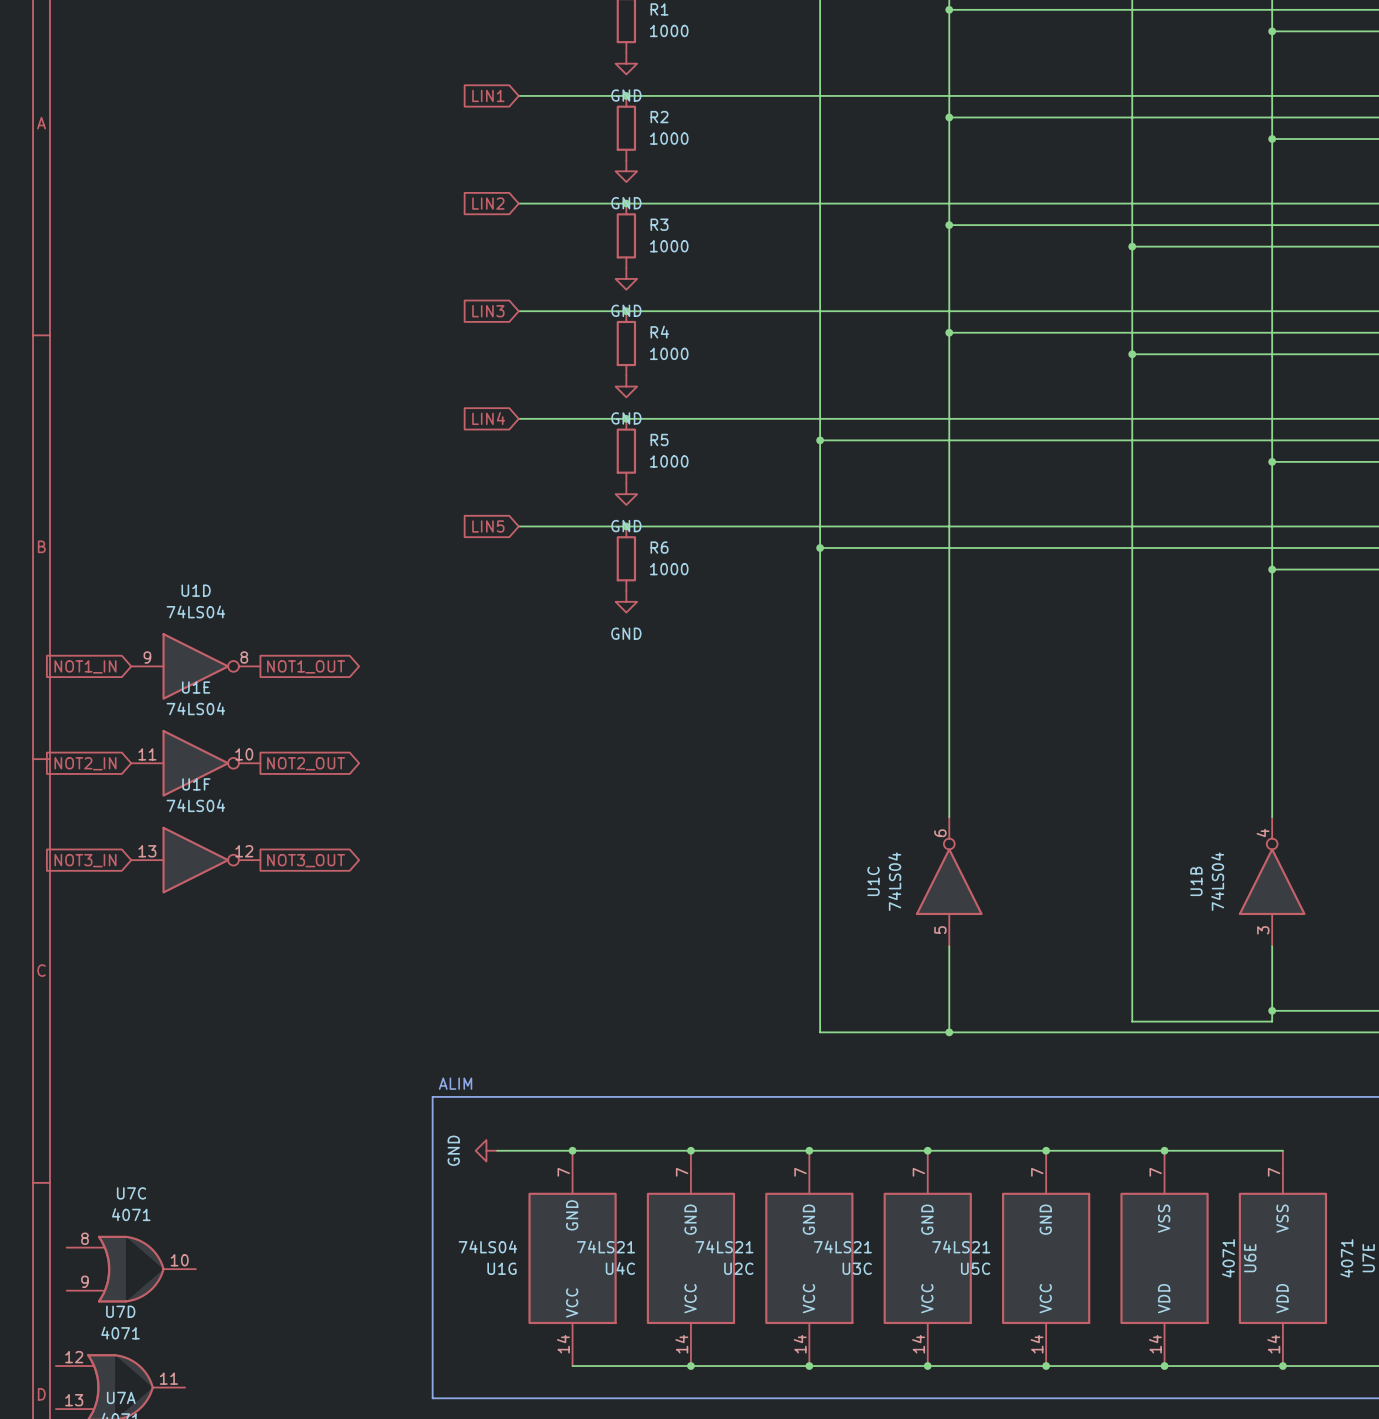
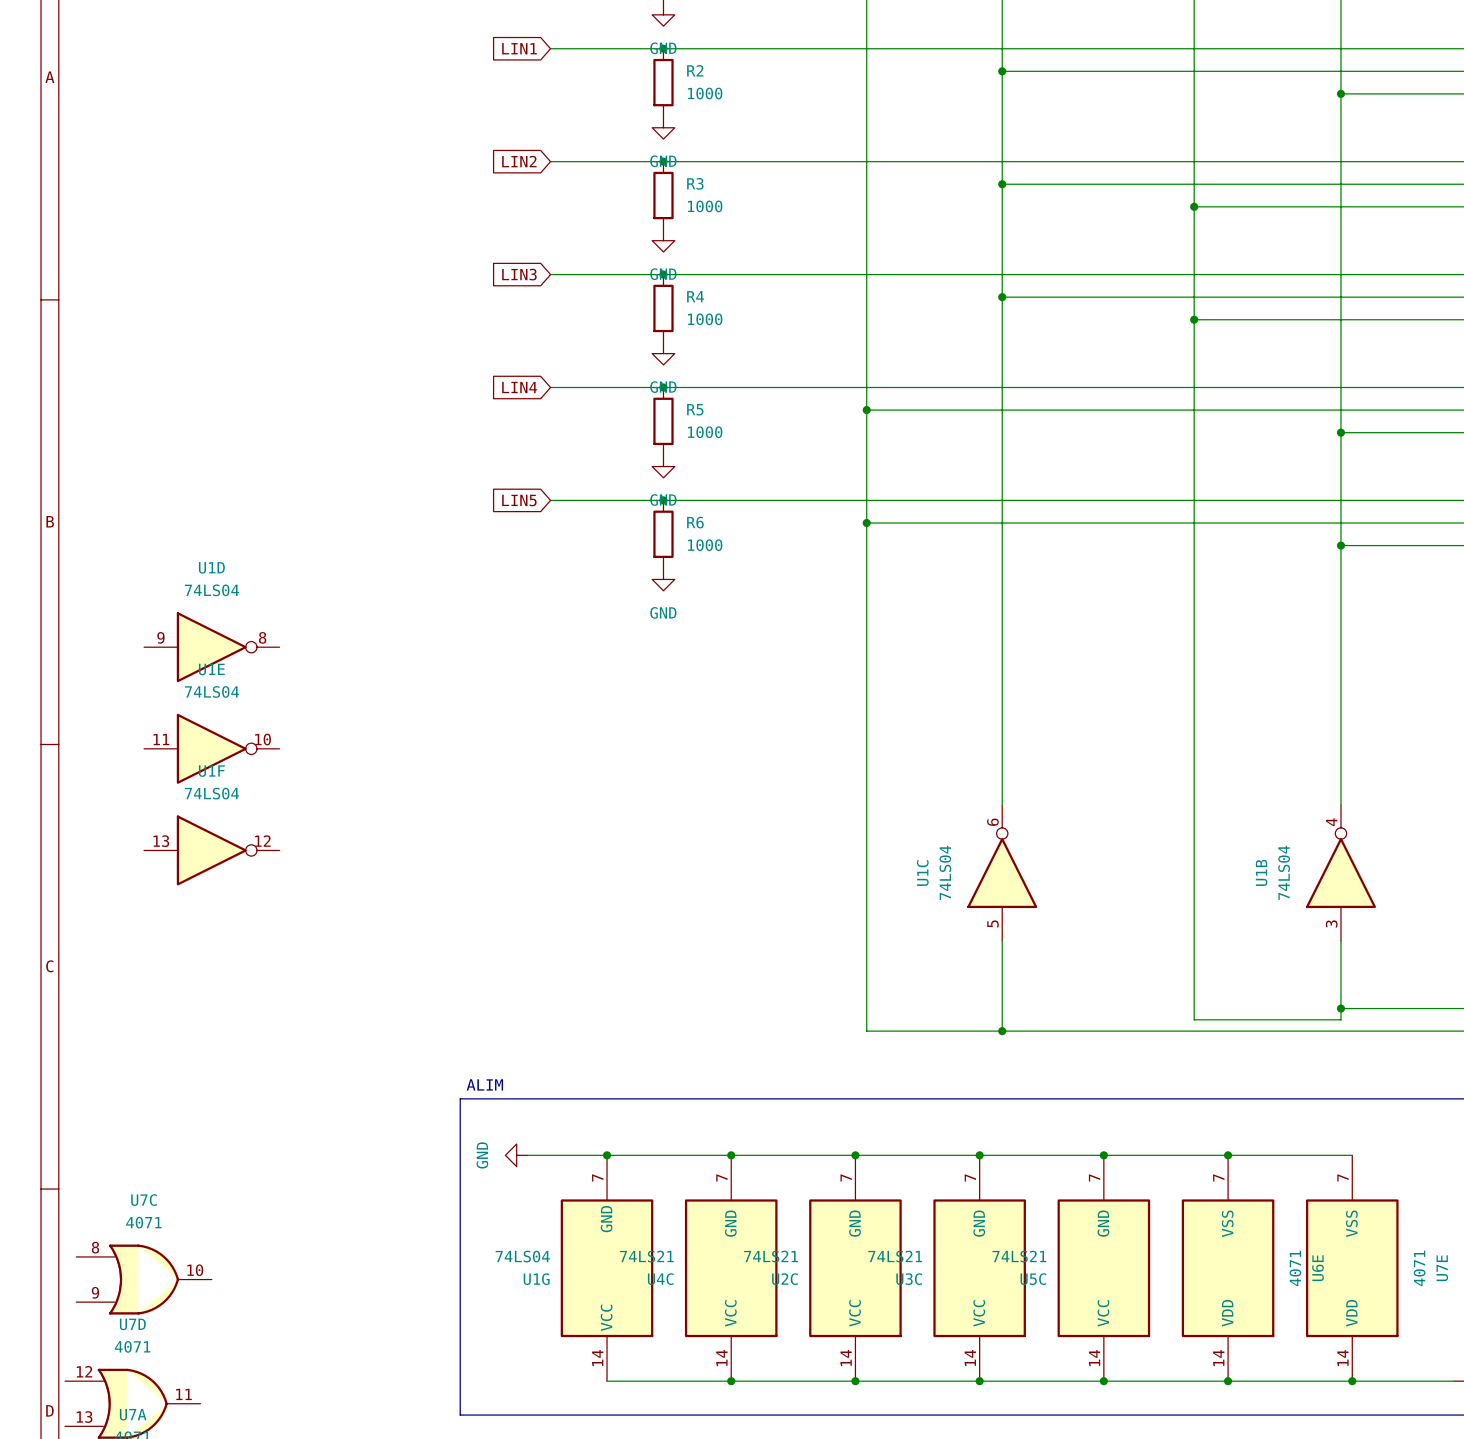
global label: NOT1_IN (85, 666) -> none
global label: NOT1_OUT (306, 666) -> none
global label: NOT2_IN (85, 763) -> none
global label: NOT2_OUT (306, 763) -> none
global label: NOT3_IN (85, 860) -> none
global label: NOT3_OUT (306, 860) -> none

